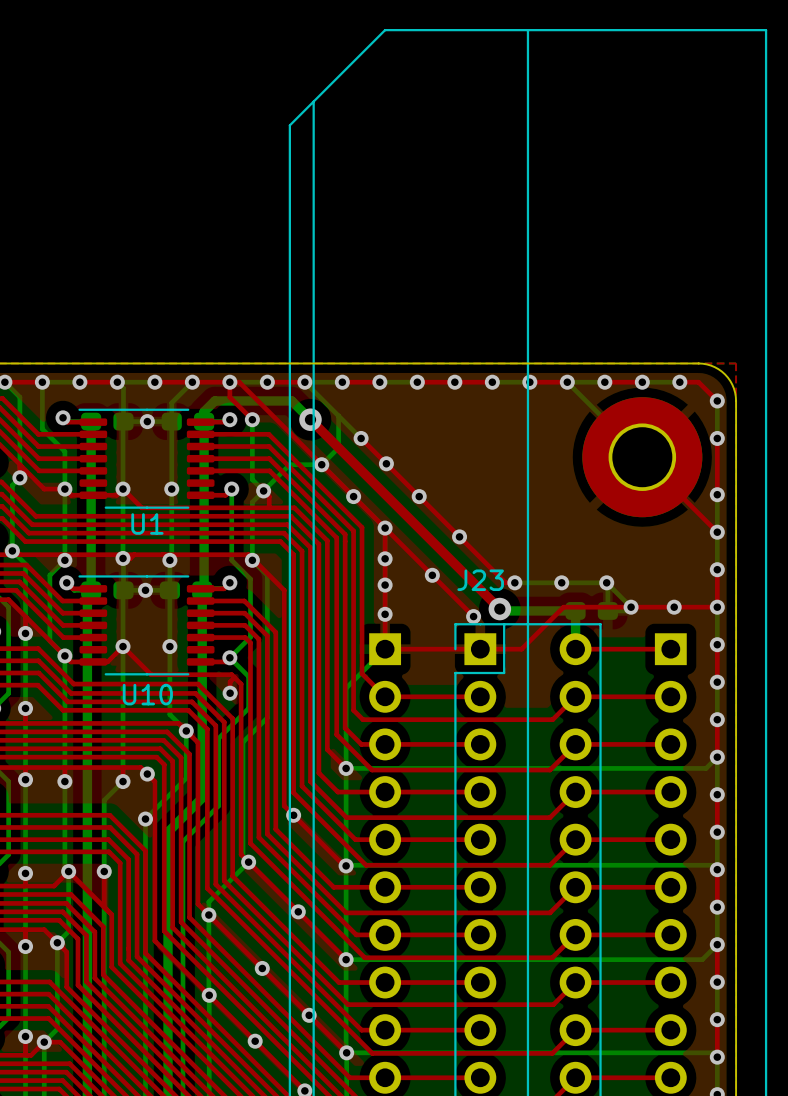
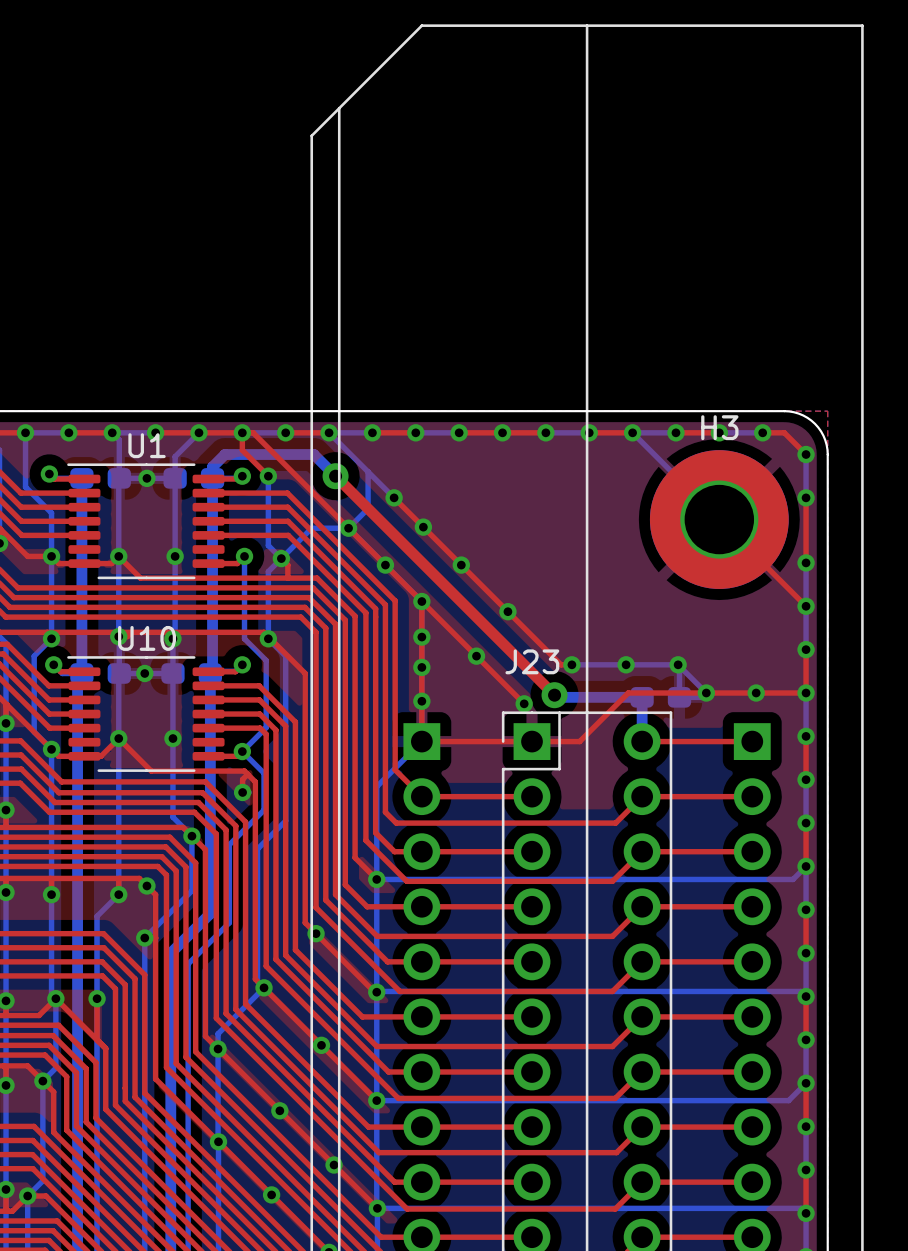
H3 name: none -> H3 (719, 427)
U1 name position: U1 (147, 524) -> U1 (147, 445)
U10 name position: U10 (147, 694) -> U10 (147, 638)

